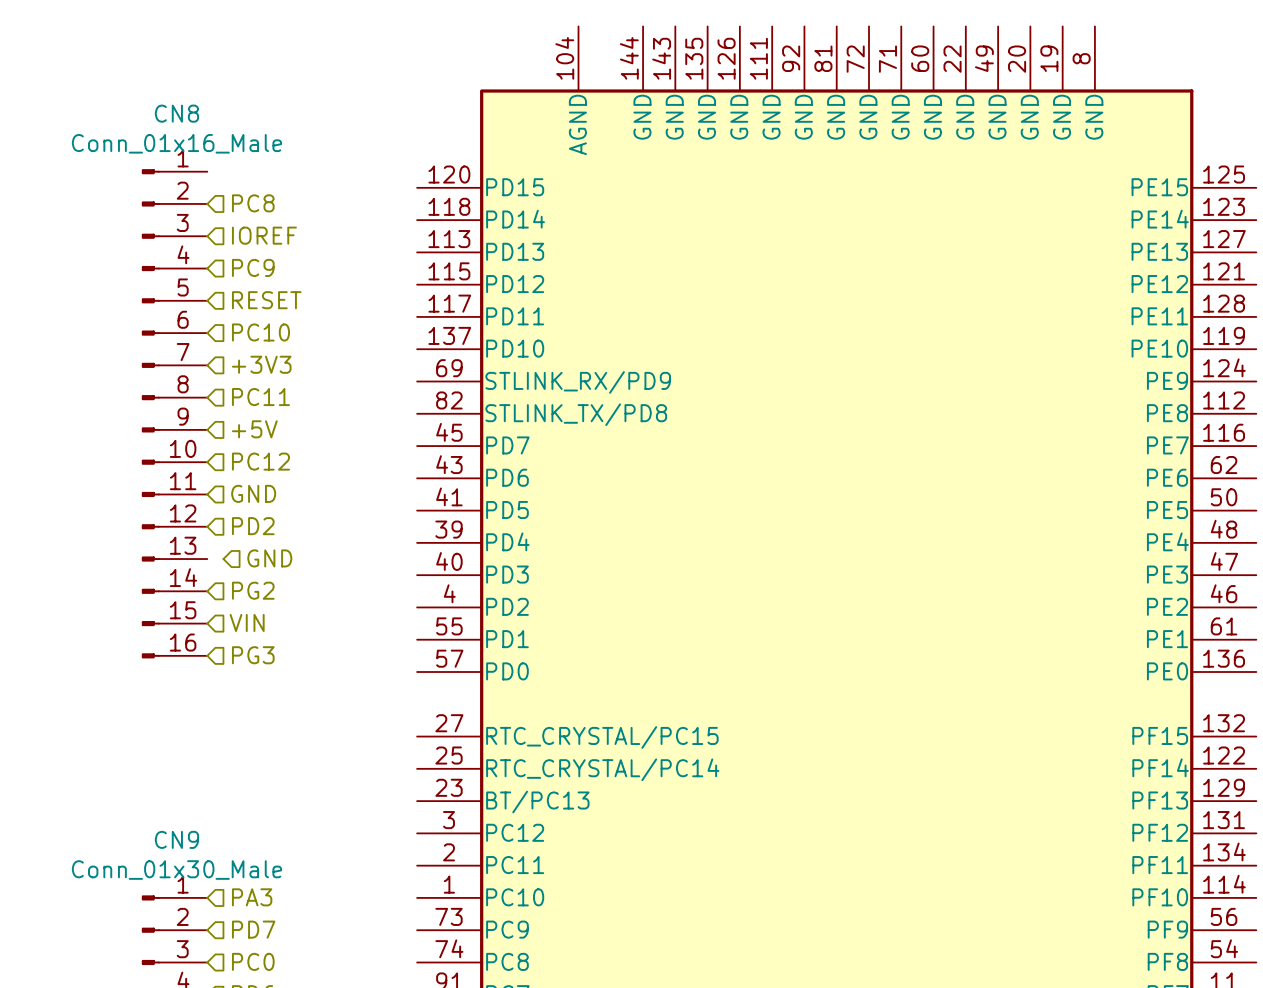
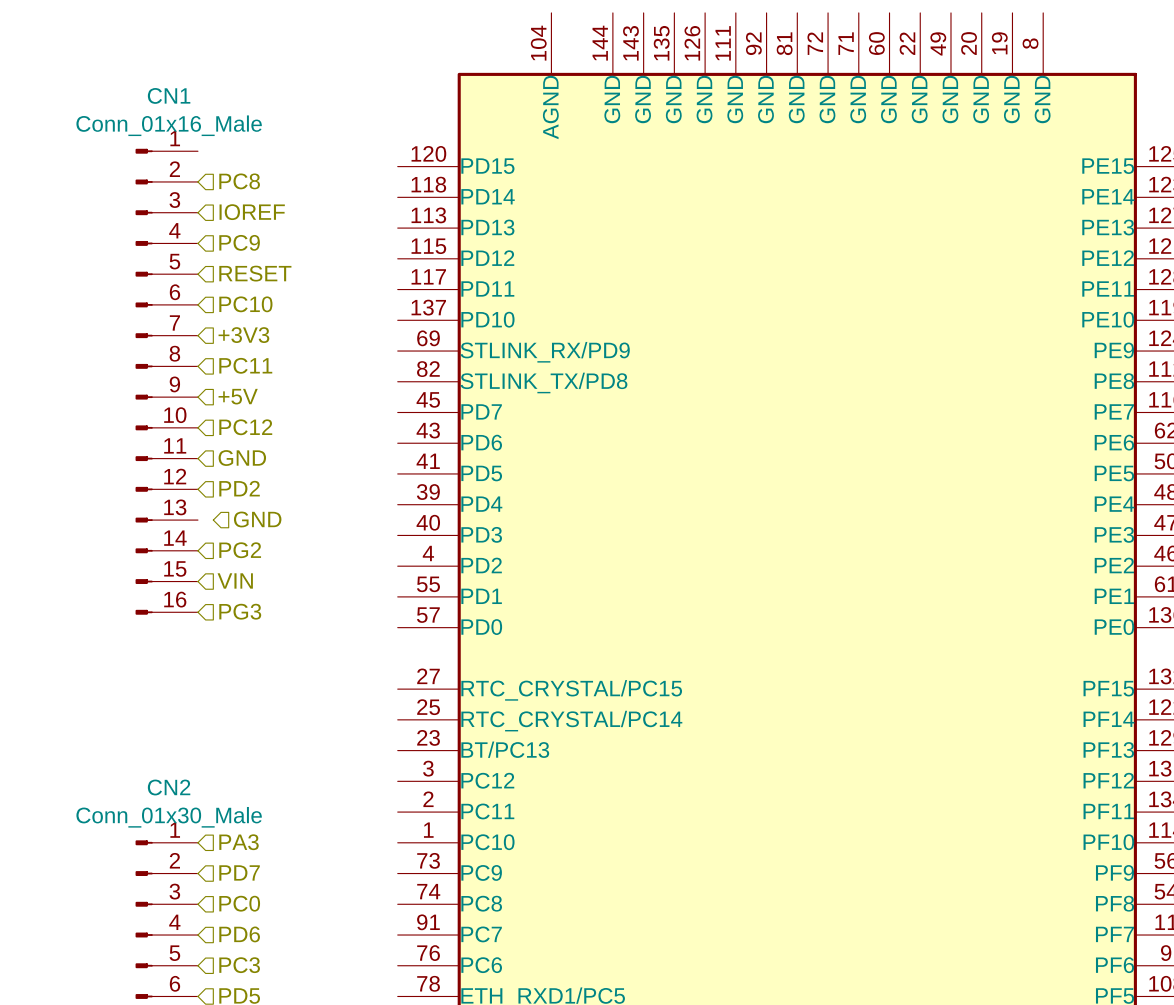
CN8 name: CN8 (176, 113) -> CN1 (169, 95)
CN9 name: CN9 (176, 839) -> CN2 (169, 787)

